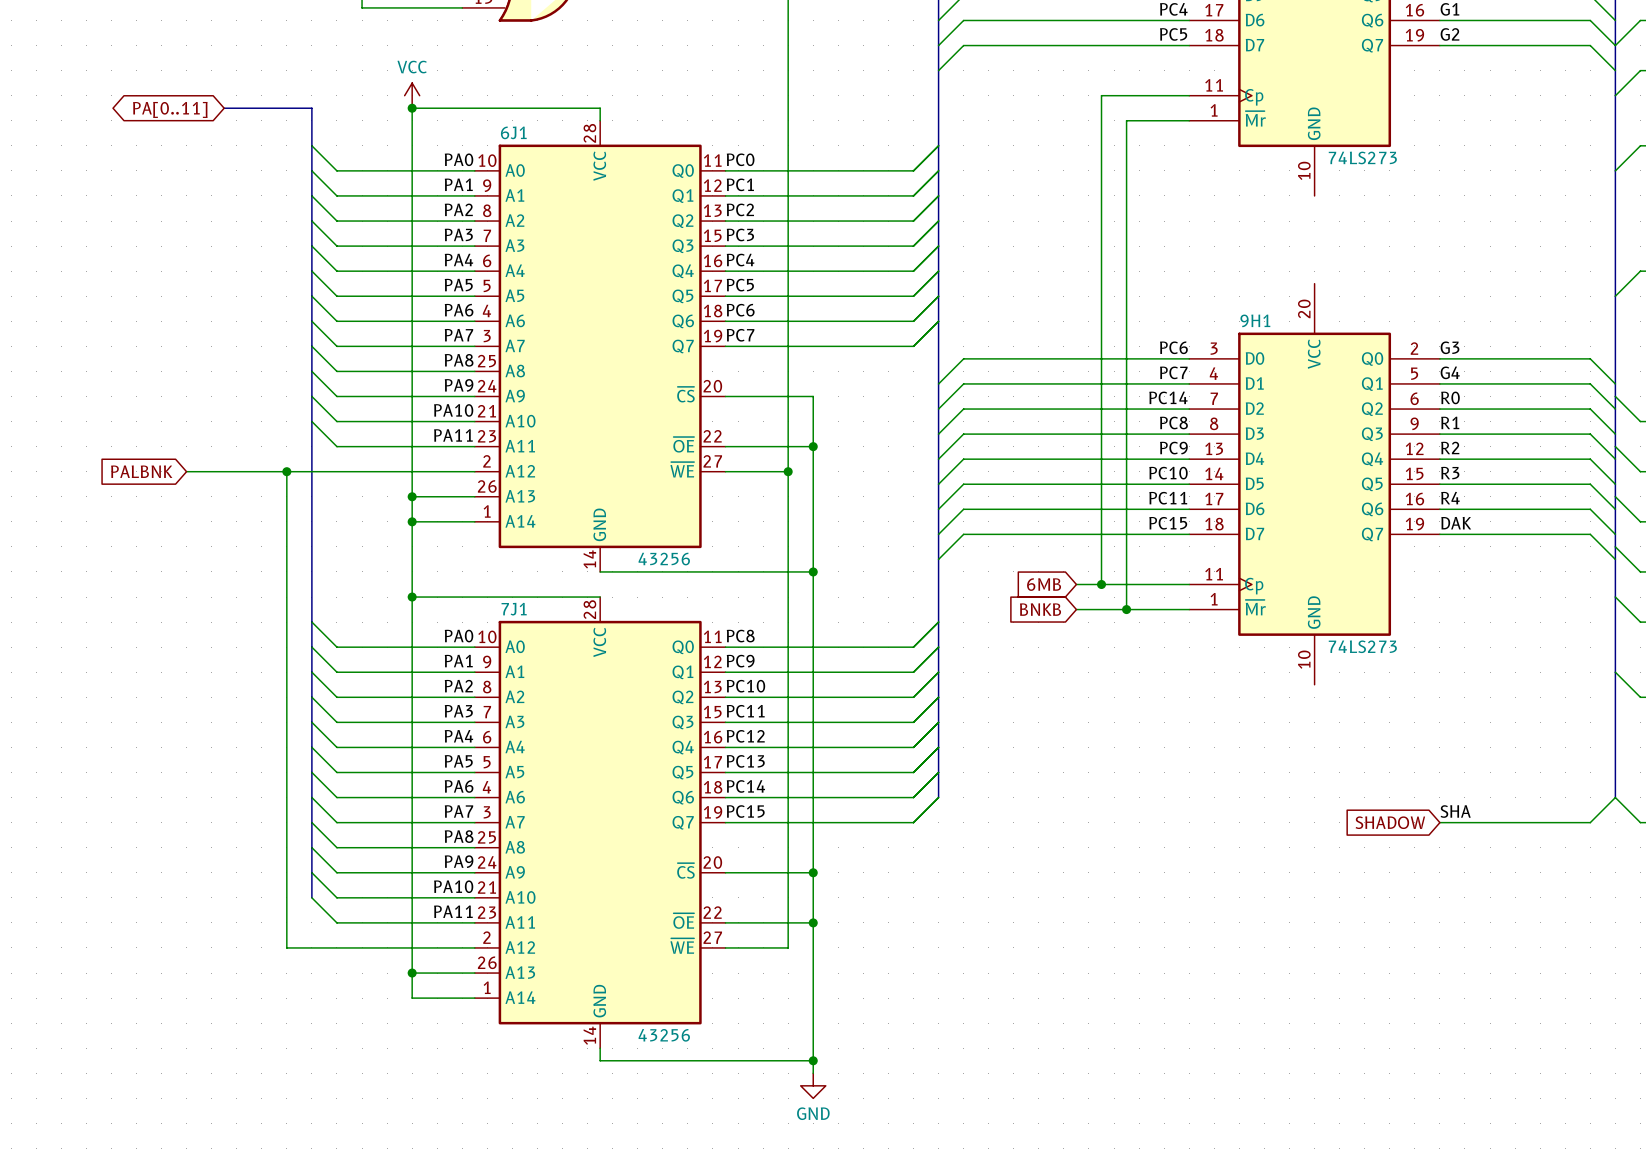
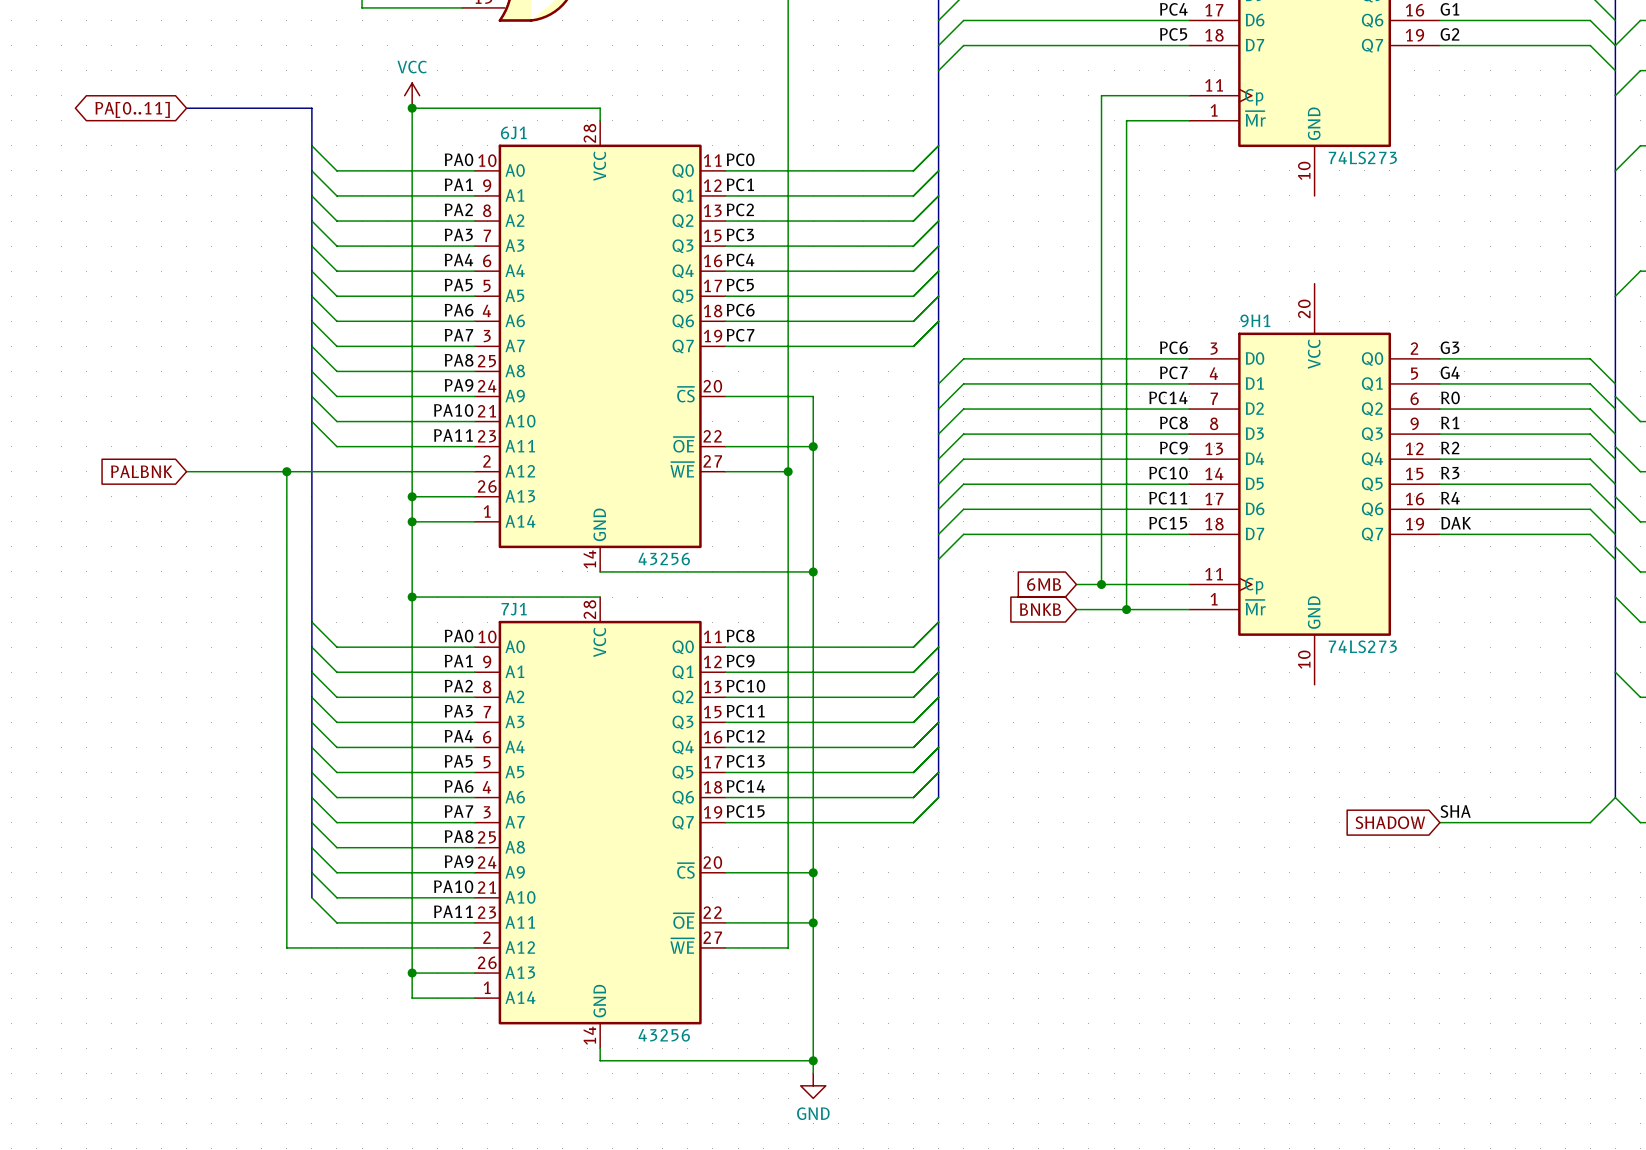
bus: none -> (186, 108) (224, 108)
global label position: PA[0..11] (170, 109) -> PA[0..11] (132, 109)

